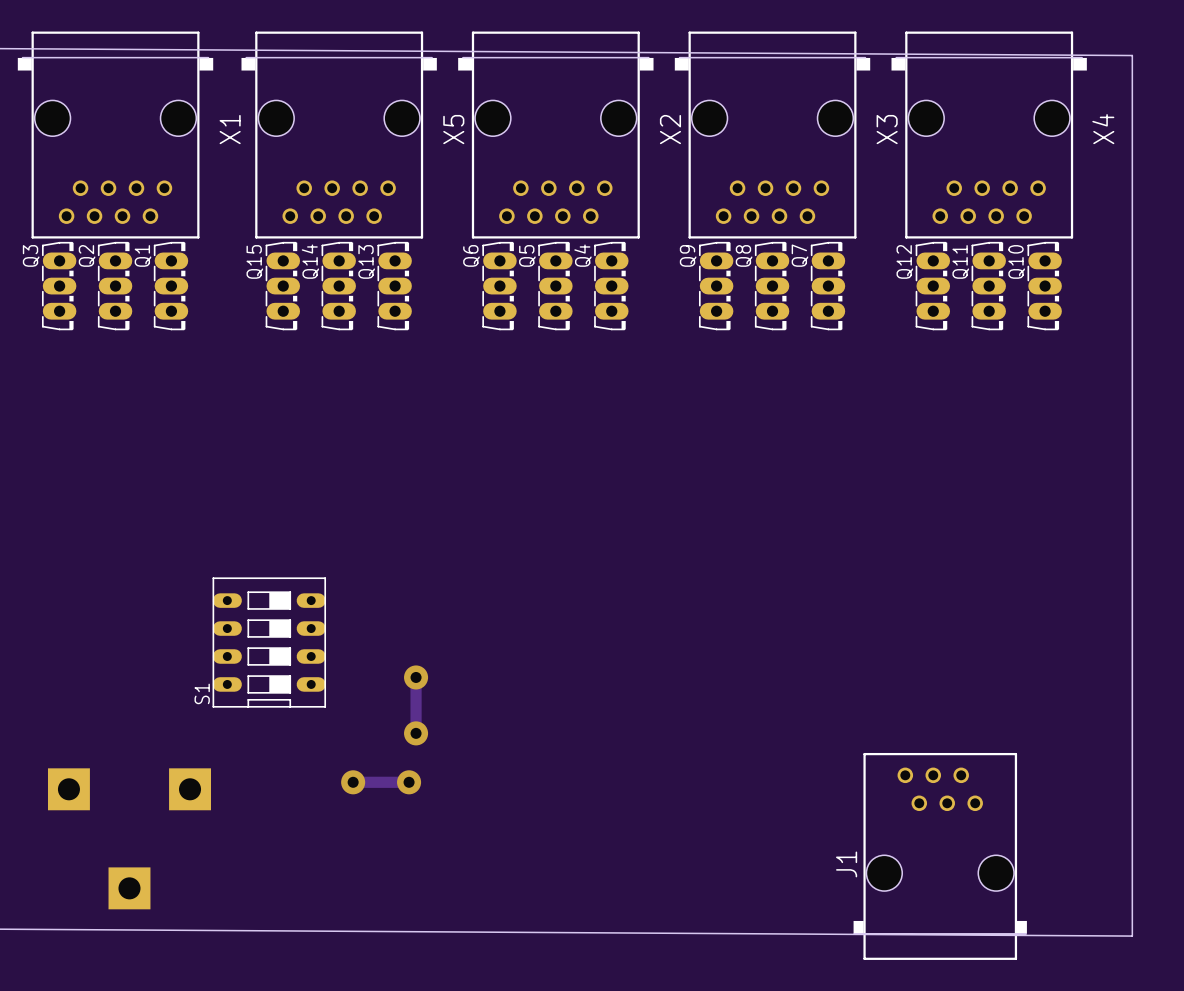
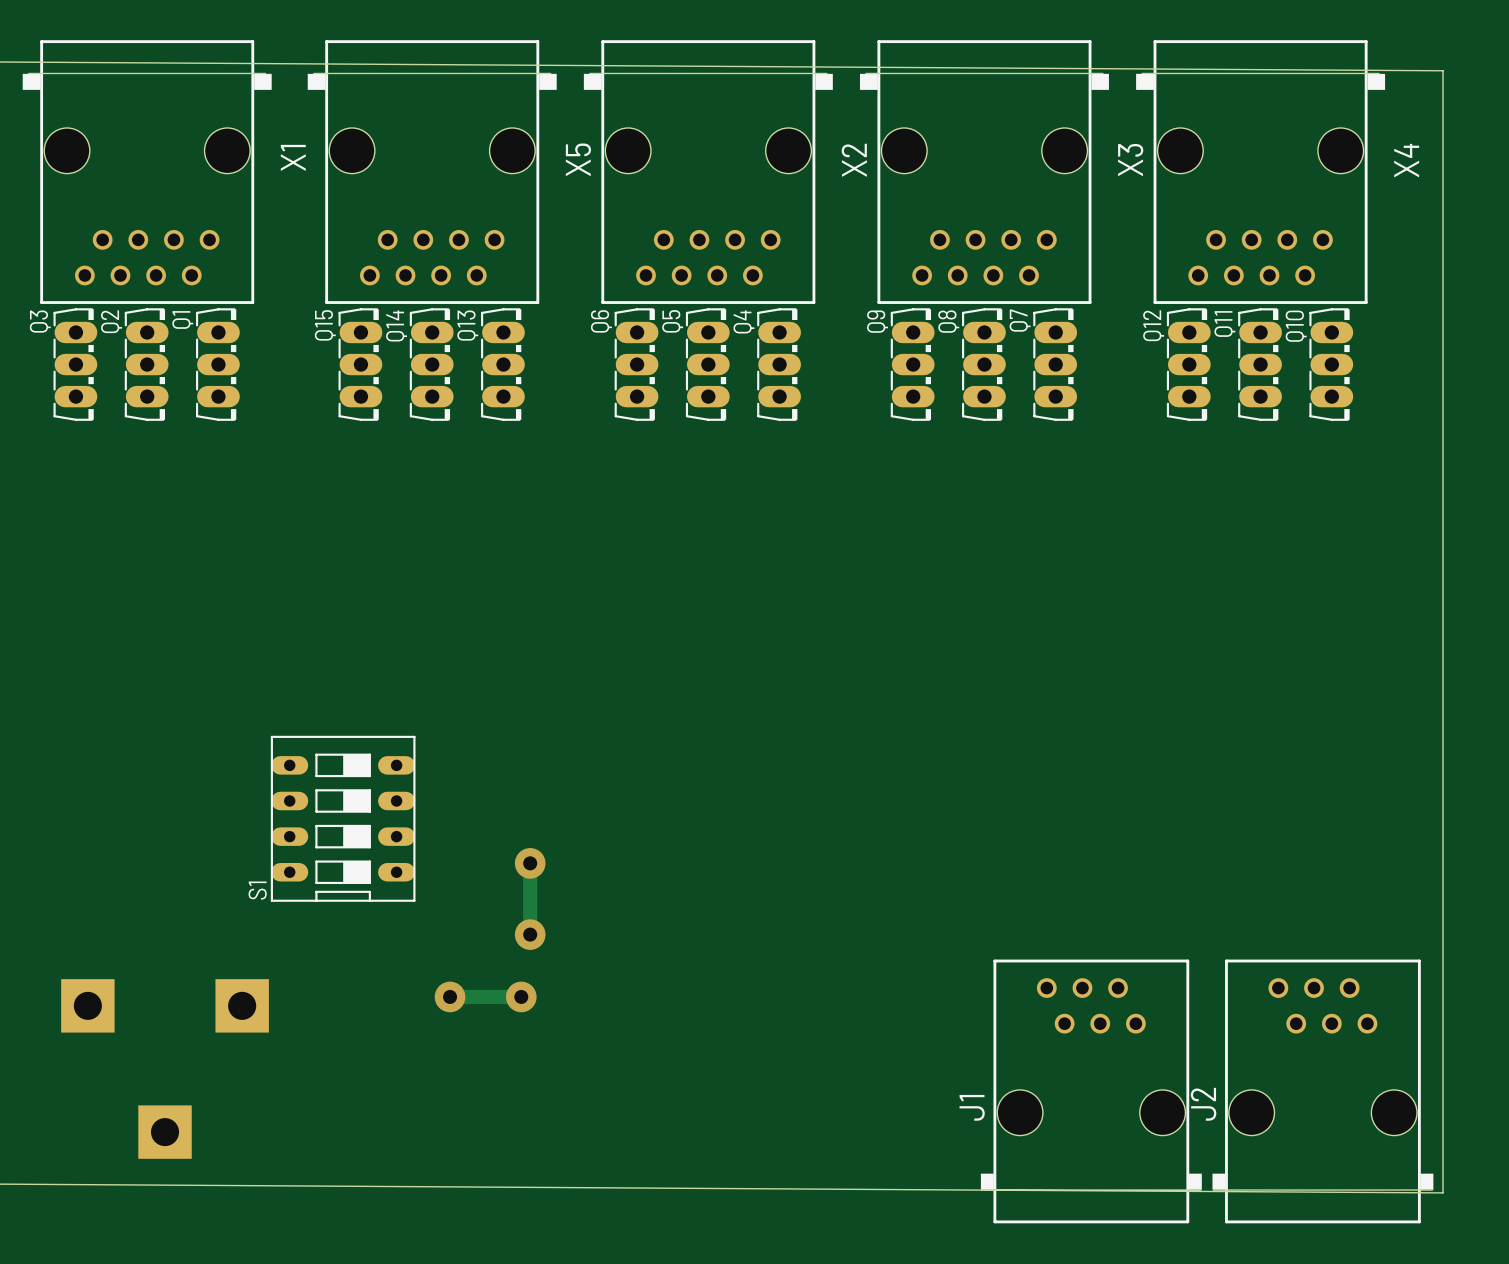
J1 position: (940, 856) -> (1091, 1091)
J2: none -> (1322, 1091)

